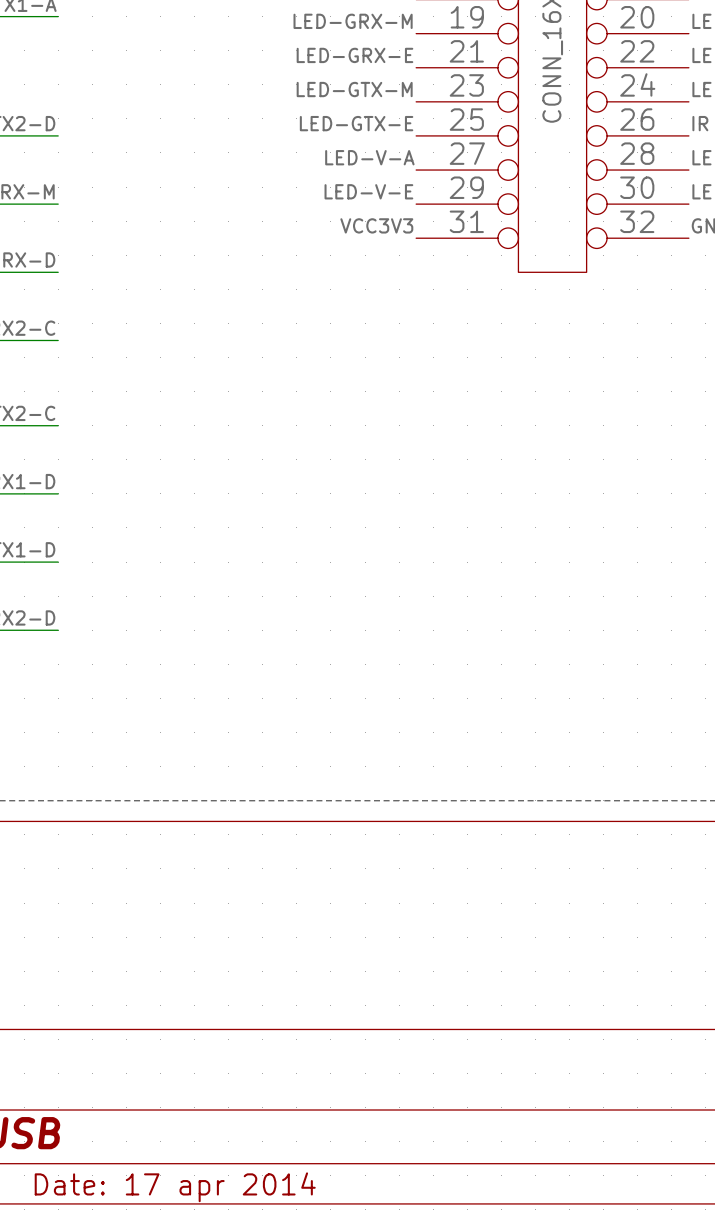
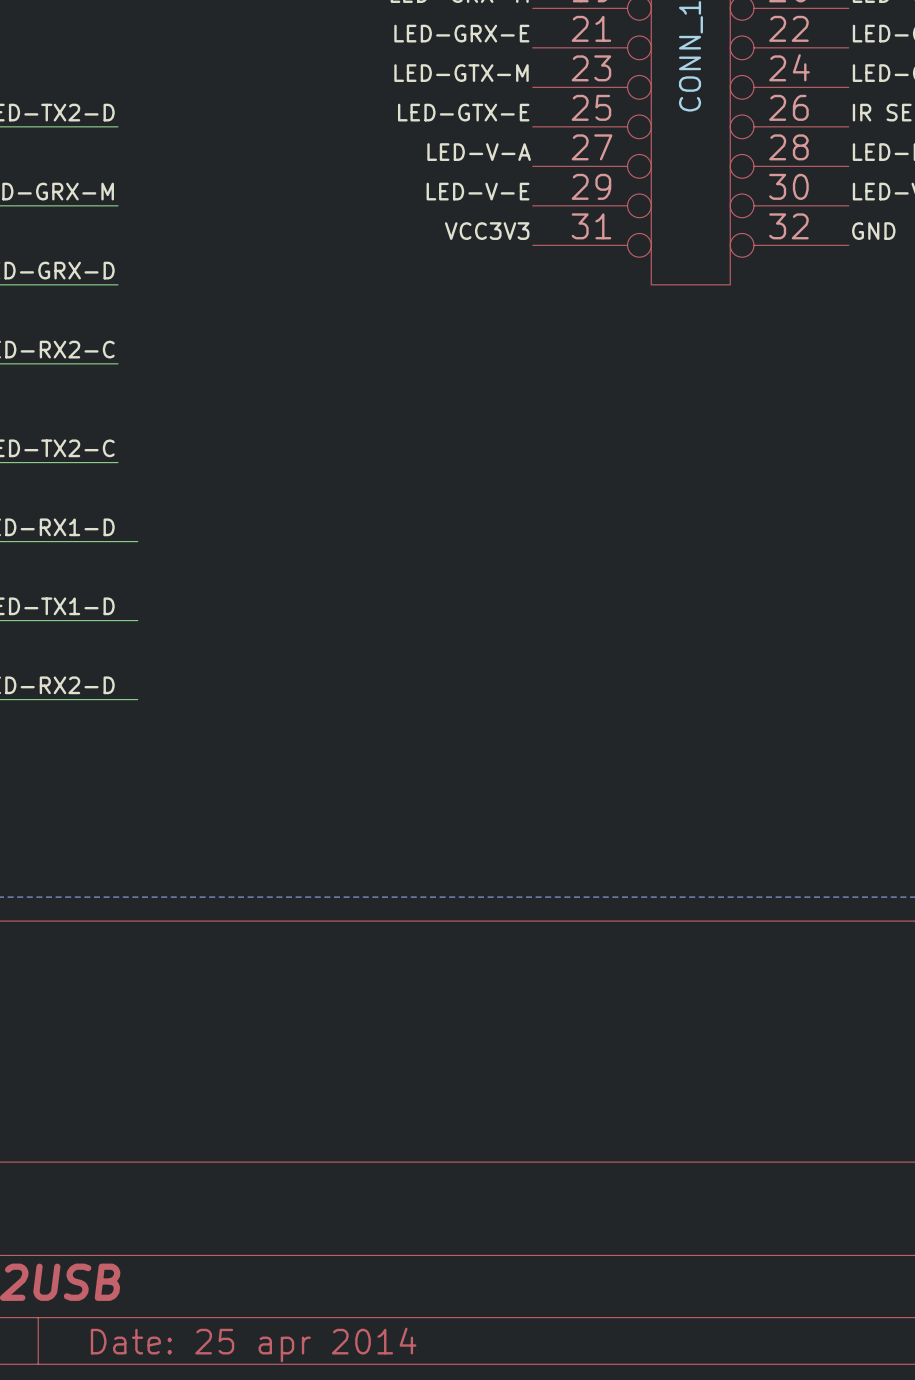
wire: none -> (118, 541) (137, 541)
wire: none -> (118, 620) (137, 620)
wire: none -> (118, 699) (137, 699)
title block: Date: 17 apr 2014 (175, 1187) -> Date: 25 apr 2014 (253, 1344)

